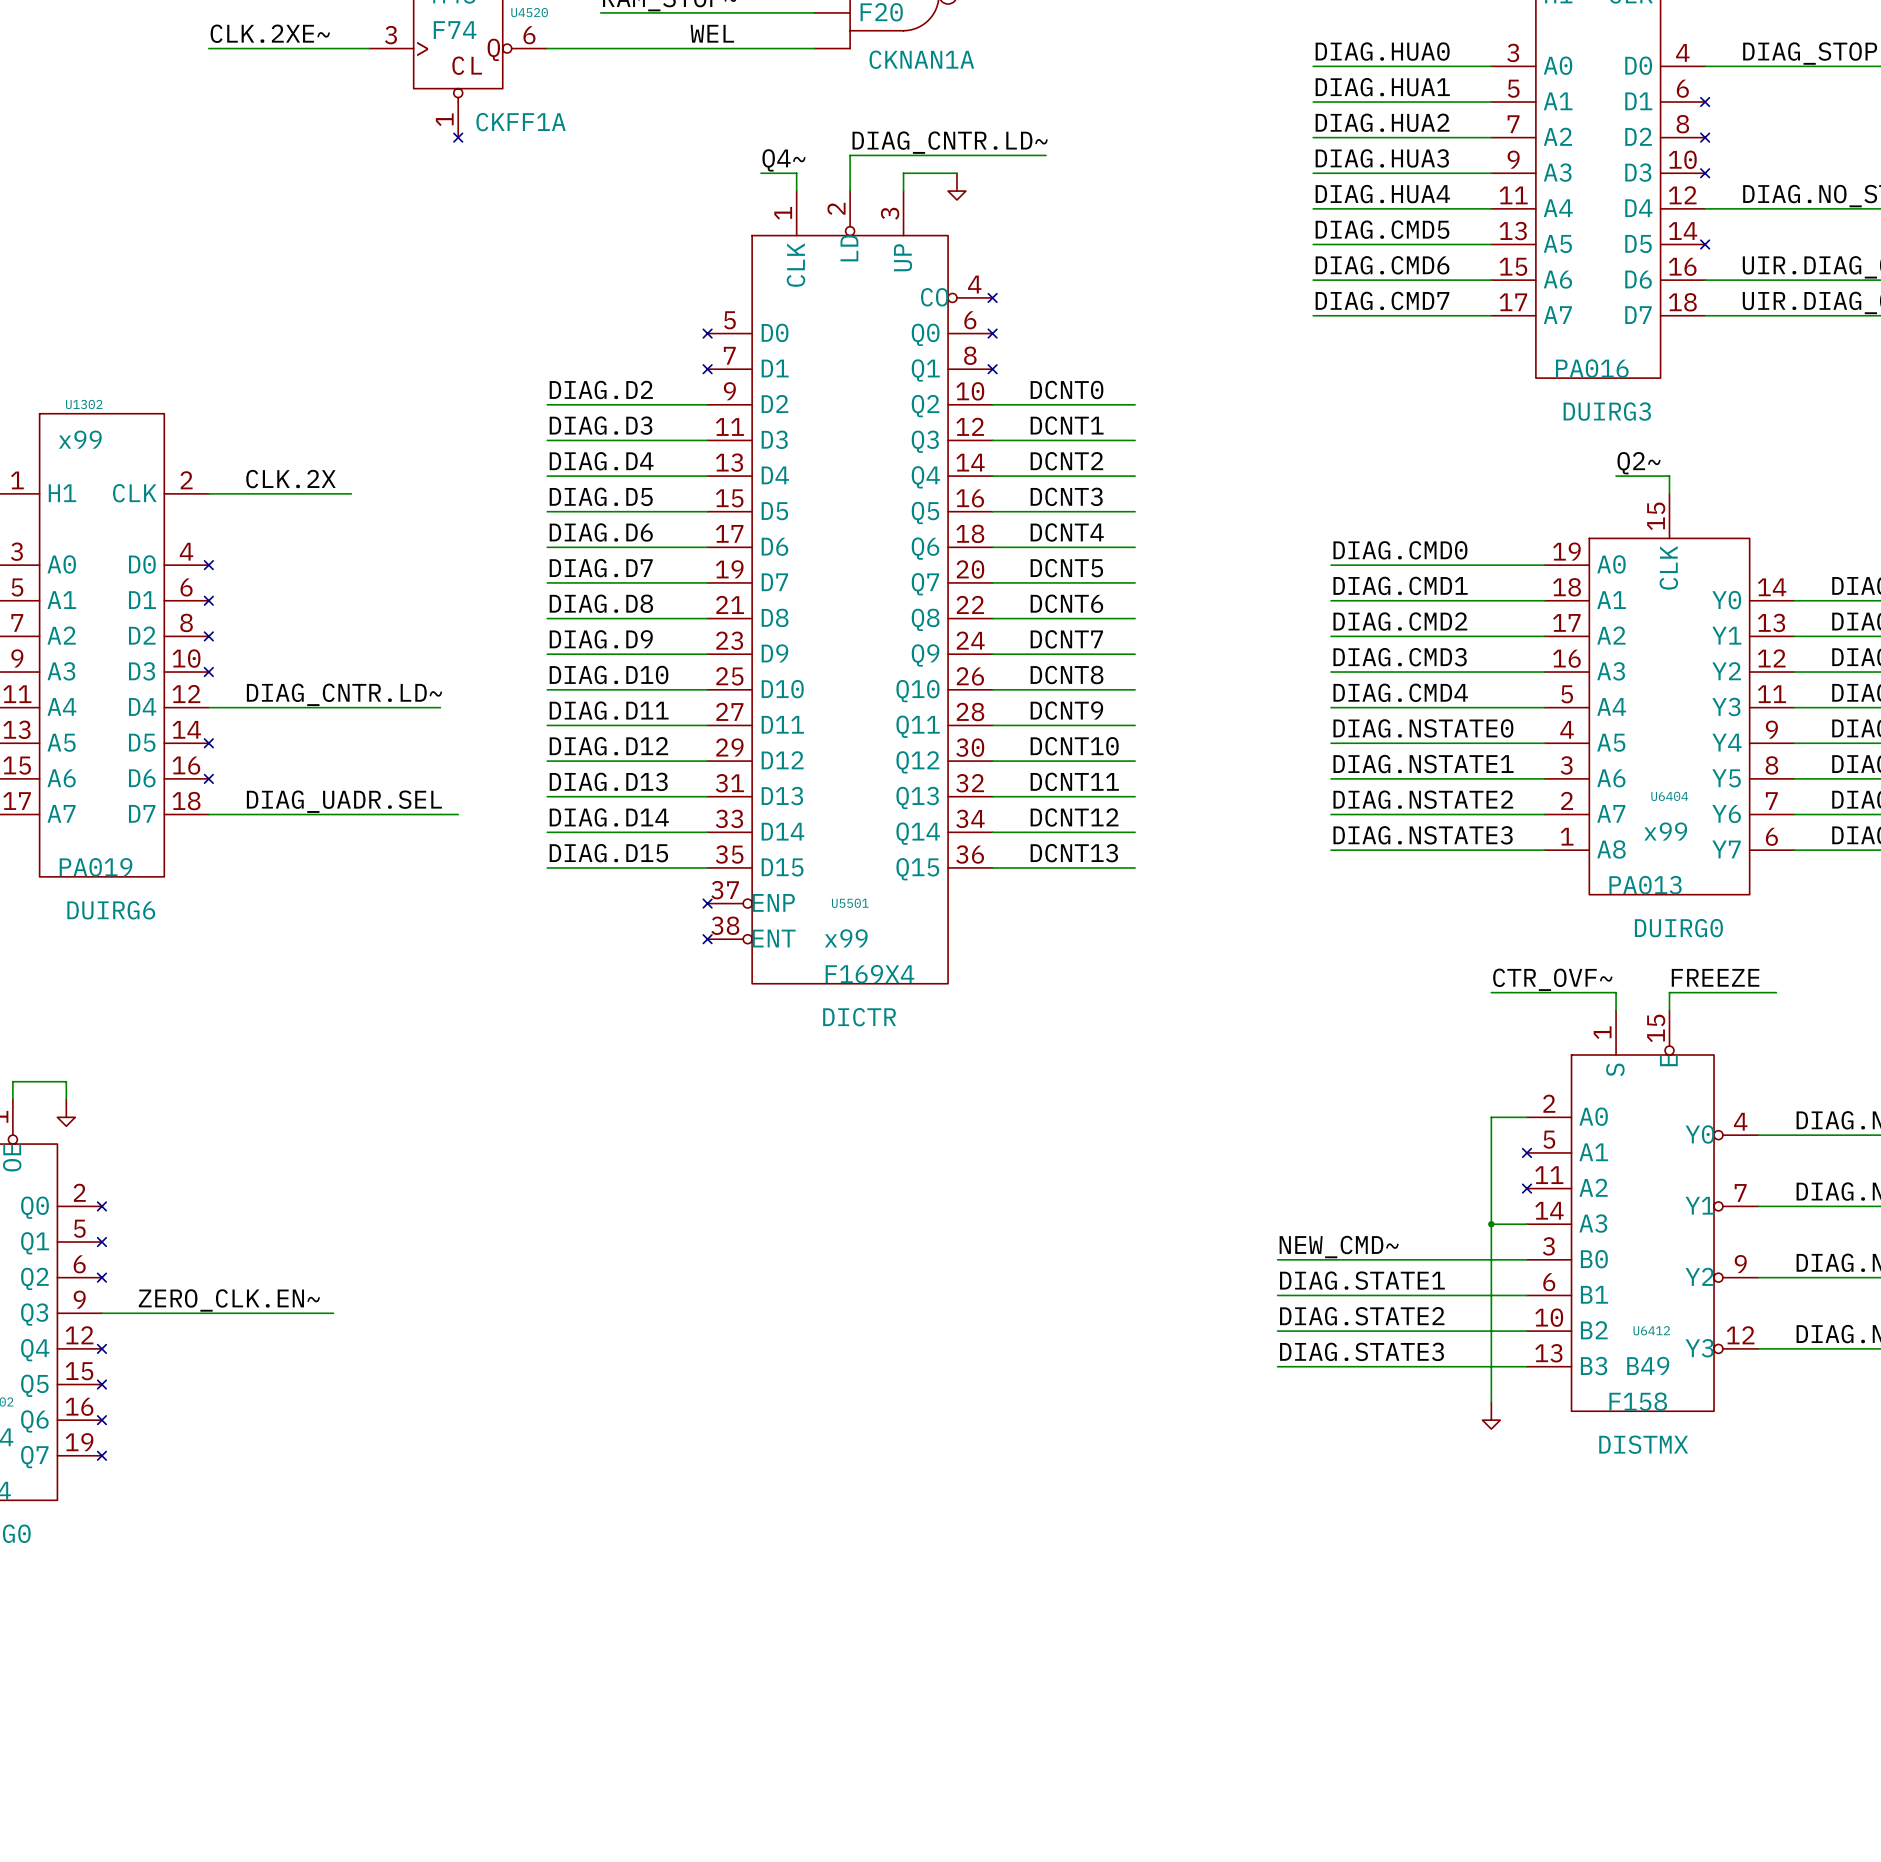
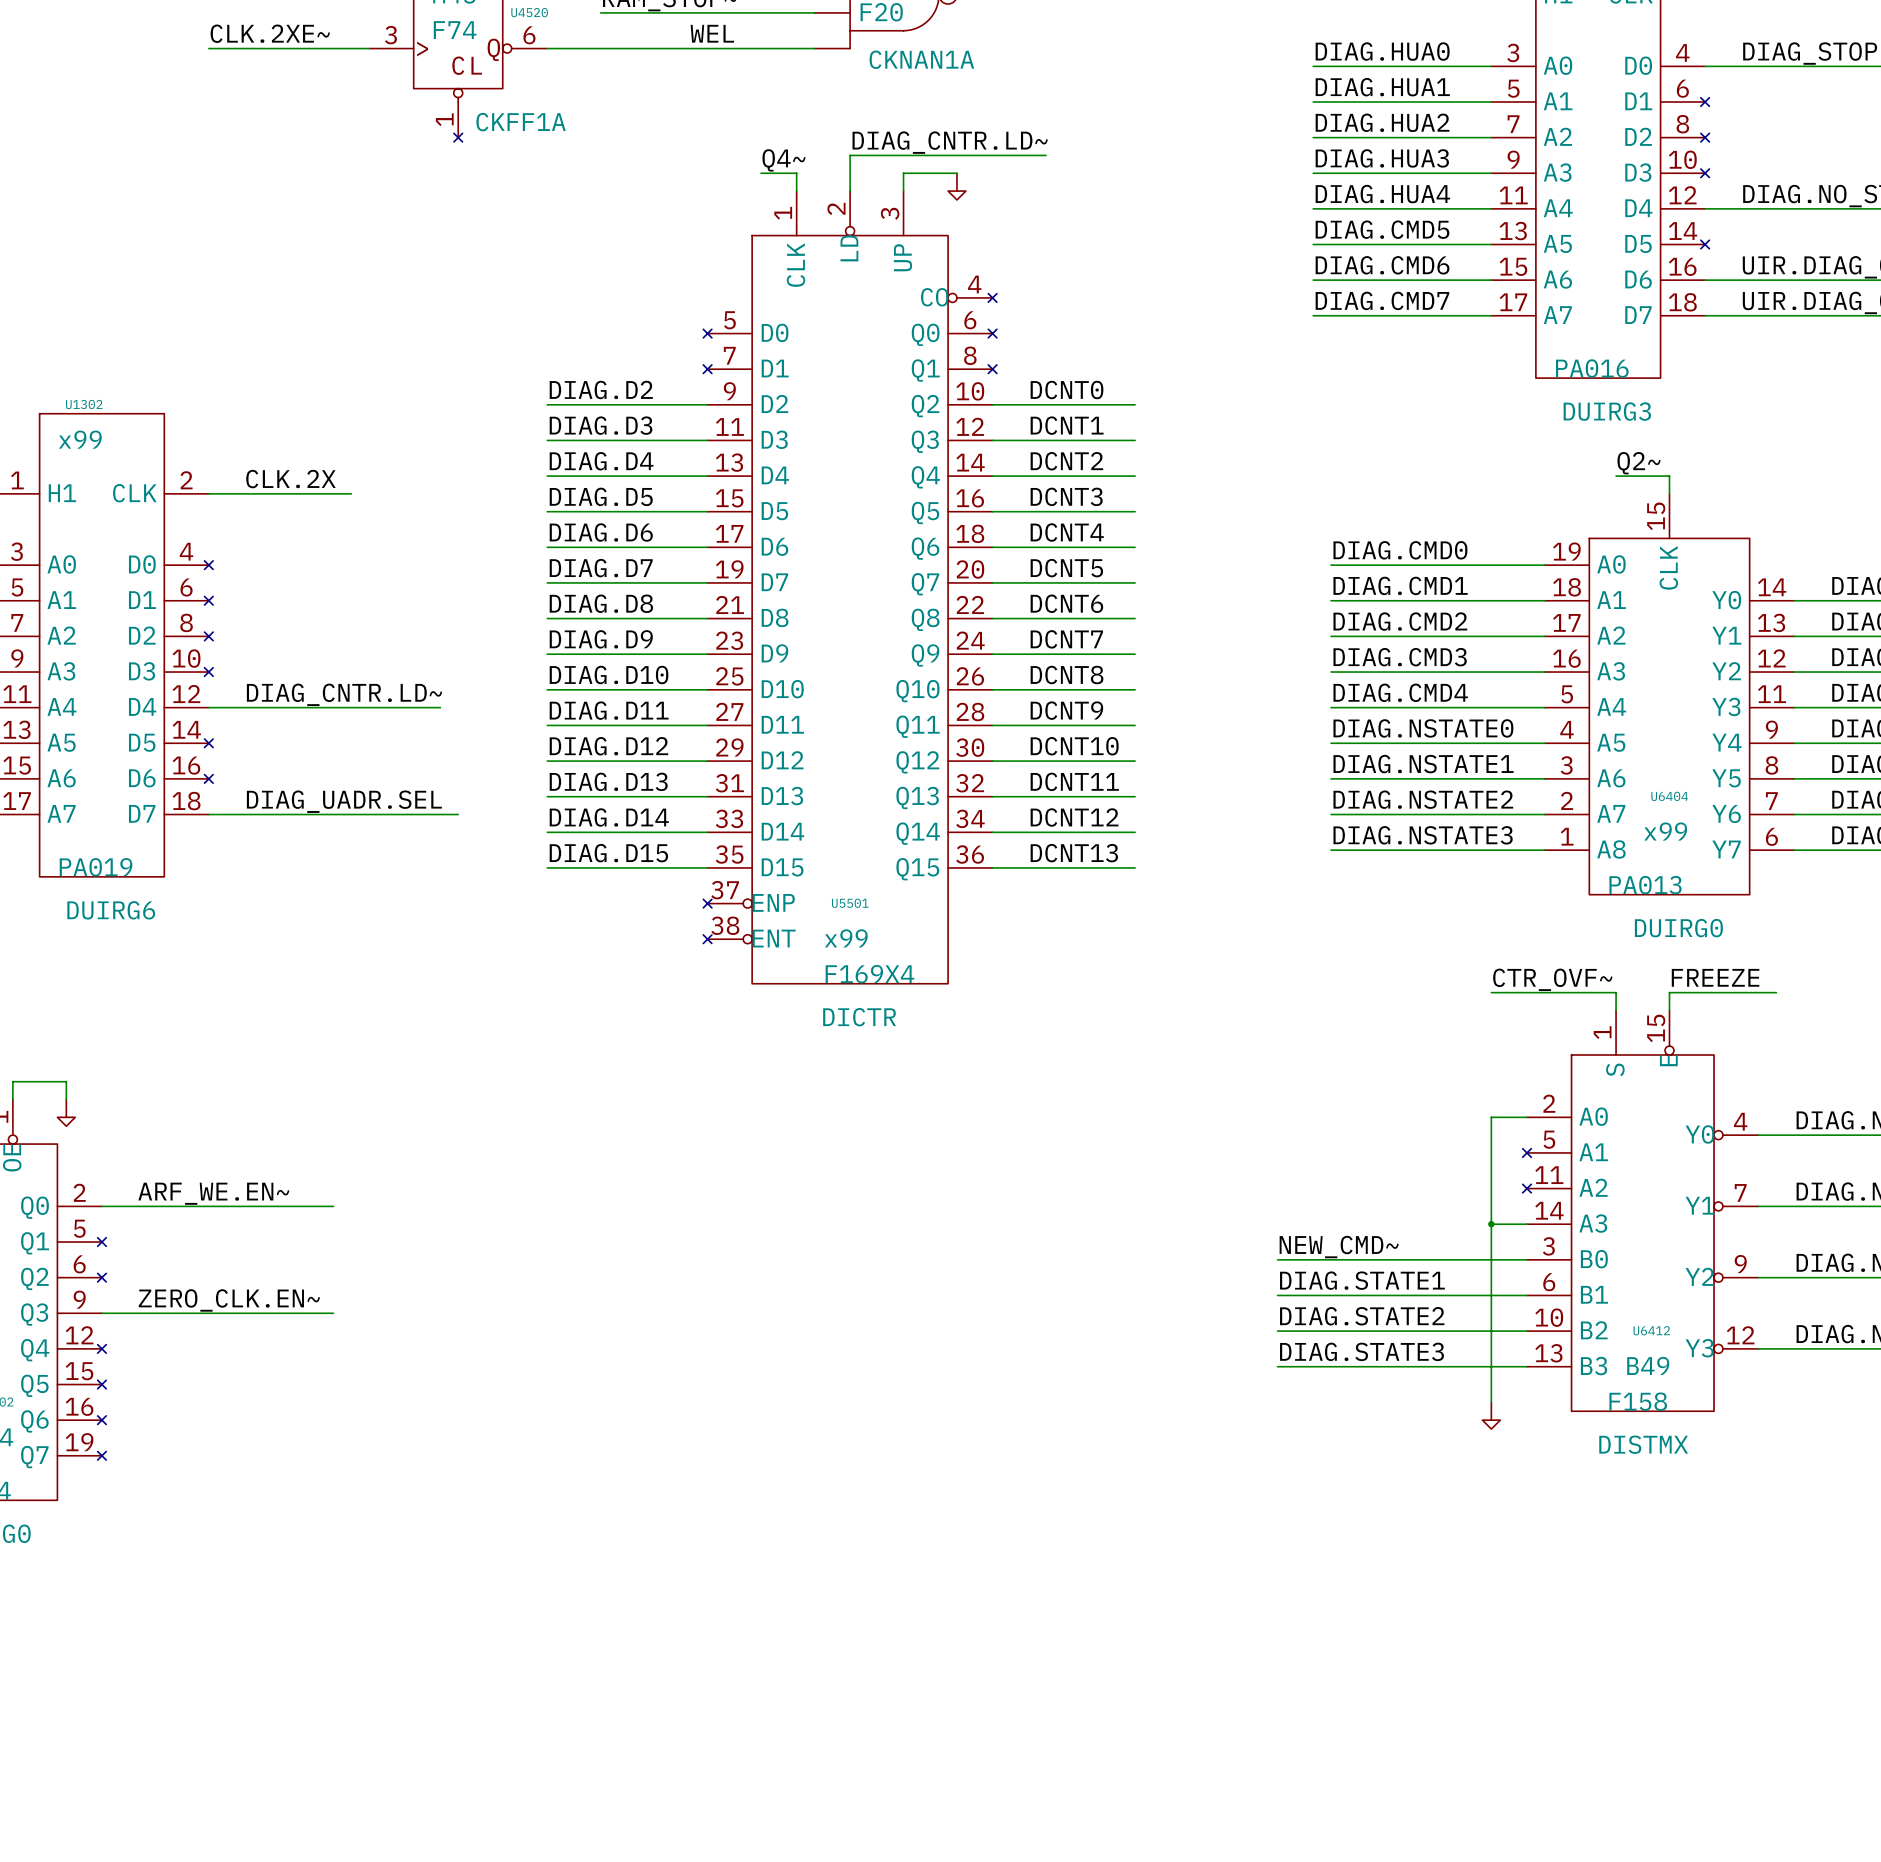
label: none -> ARF_WE.EN~ (213, 1193)
wire: none -> (101, 1206) (333, 1206)
no-connect mark: (101, 1206) -> none

